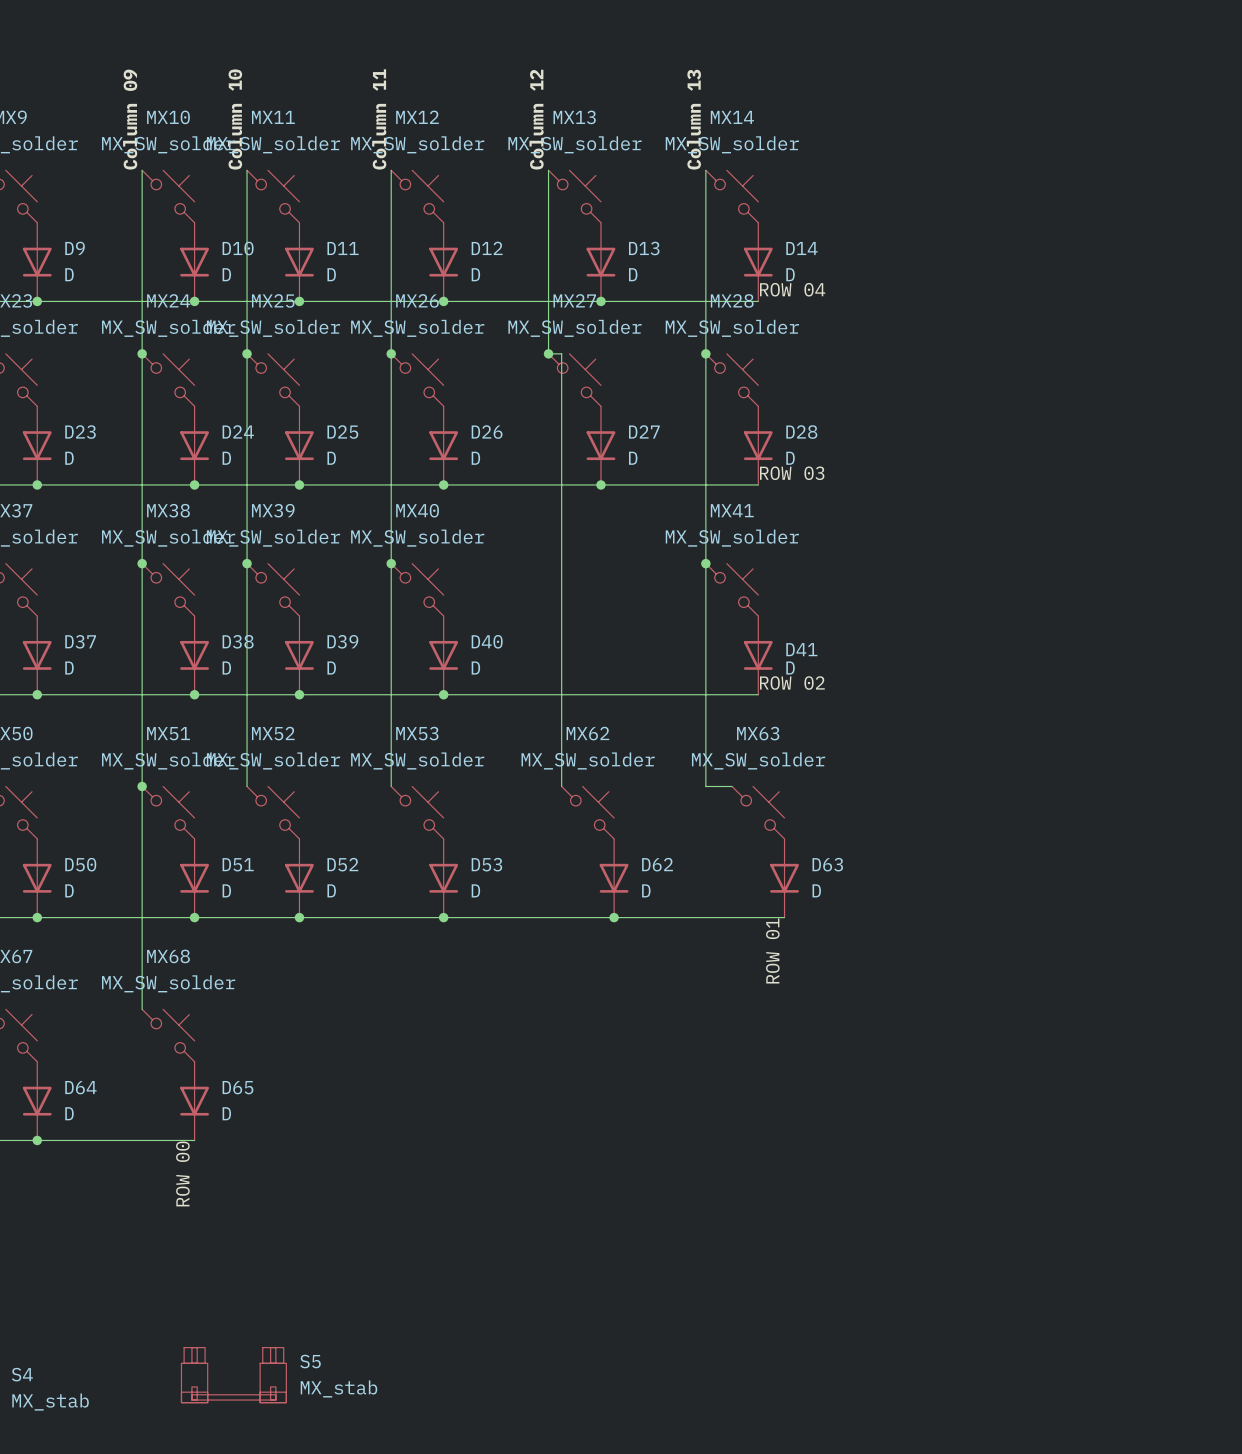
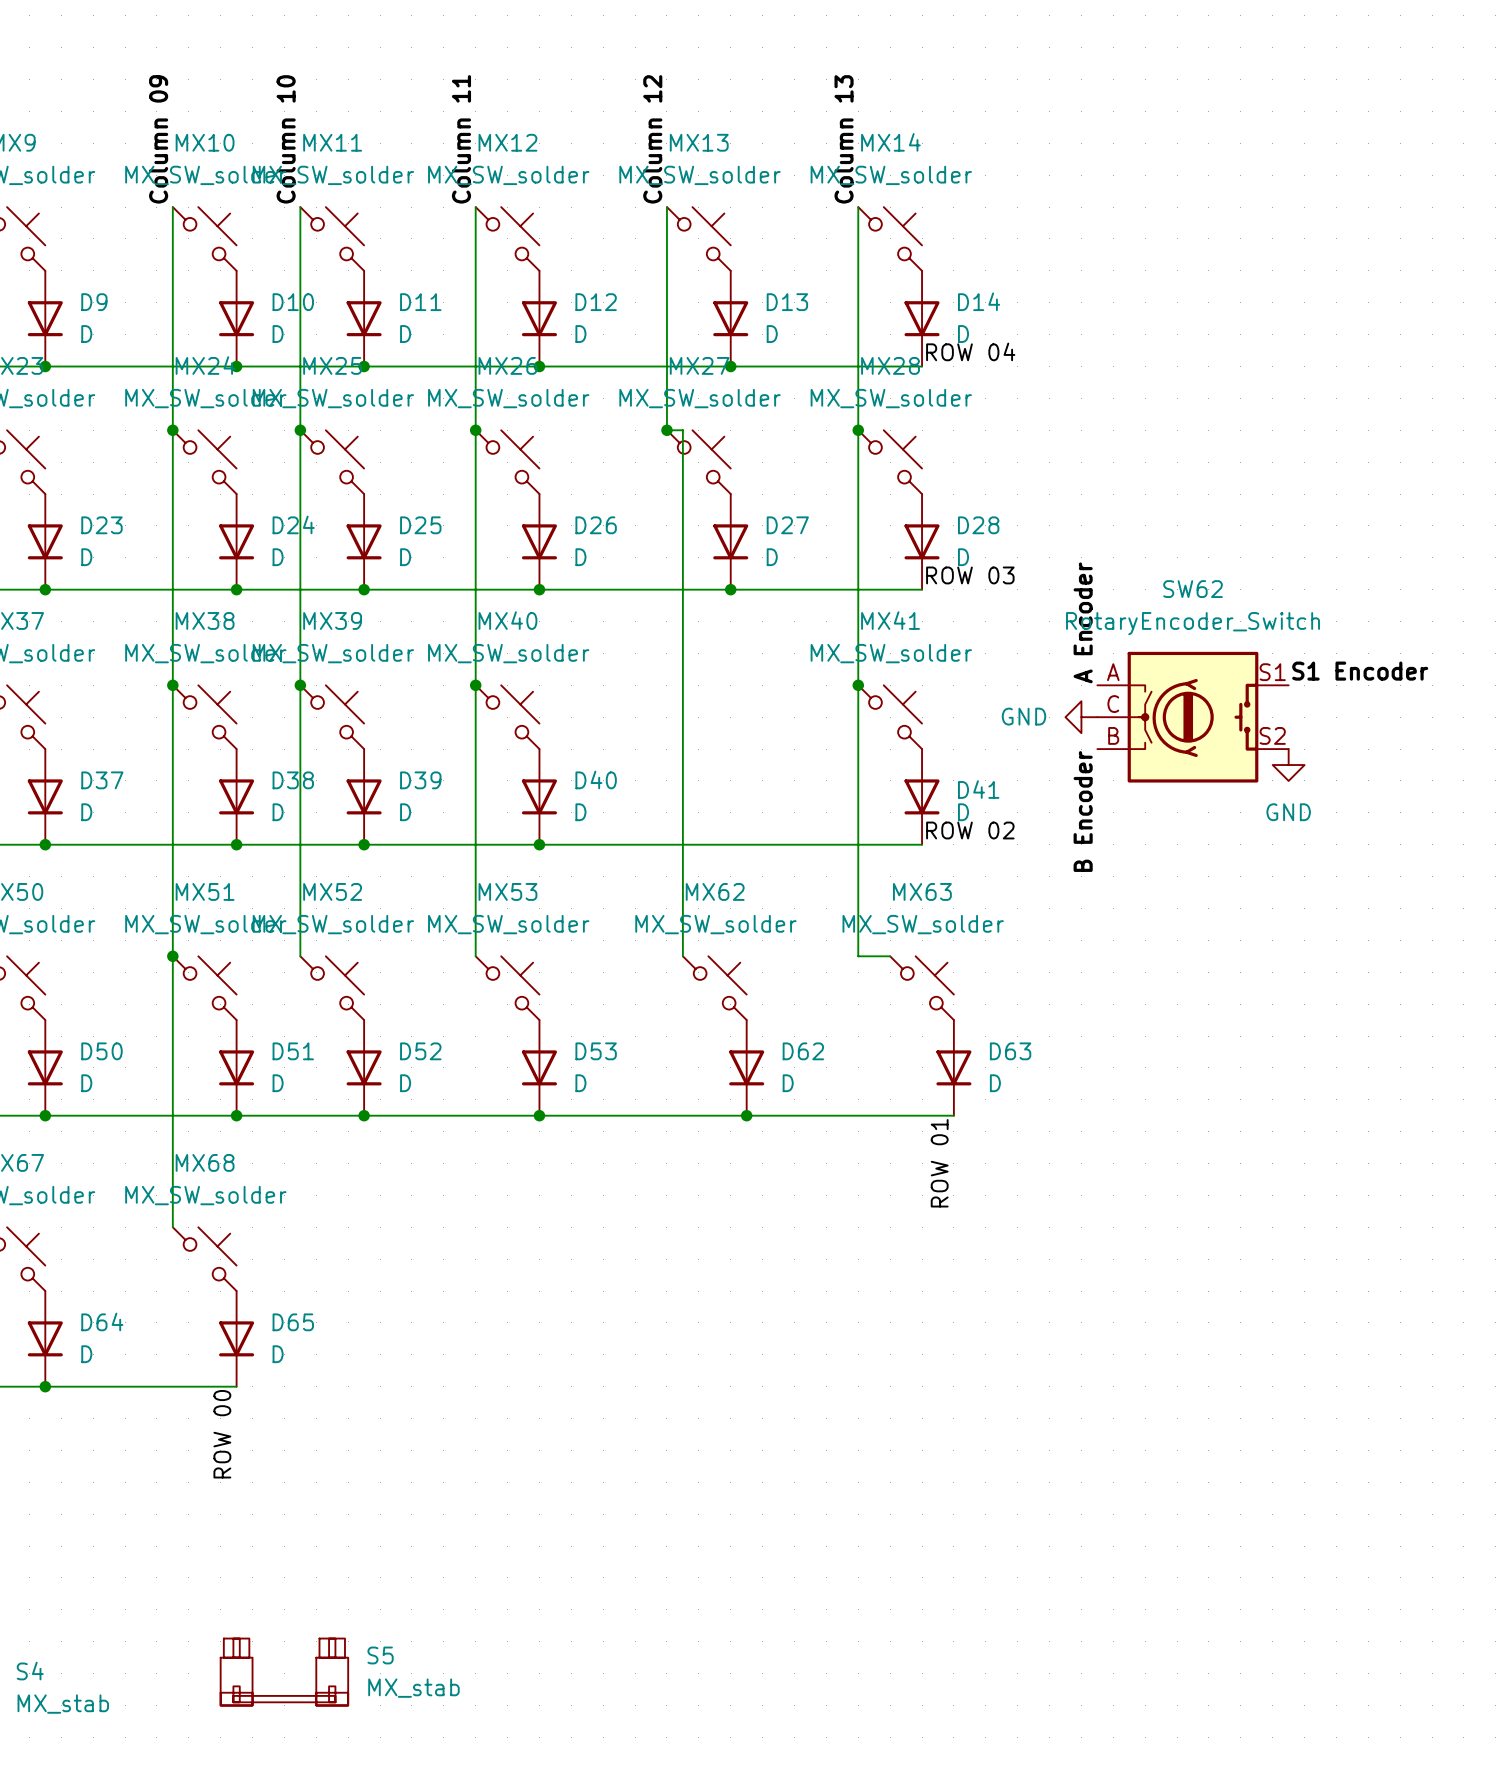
label: none -> A Encoder (1083, 622)
label: none -> S1 Encoder (1360, 671)
power symbol: none -> GND (1081, 717)
SW62: none -> RotaryEncoder_Switch (1193, 717)
power symbol: none -> GND (1288, 765)
label: none -> B Encoder (1083, 811)

